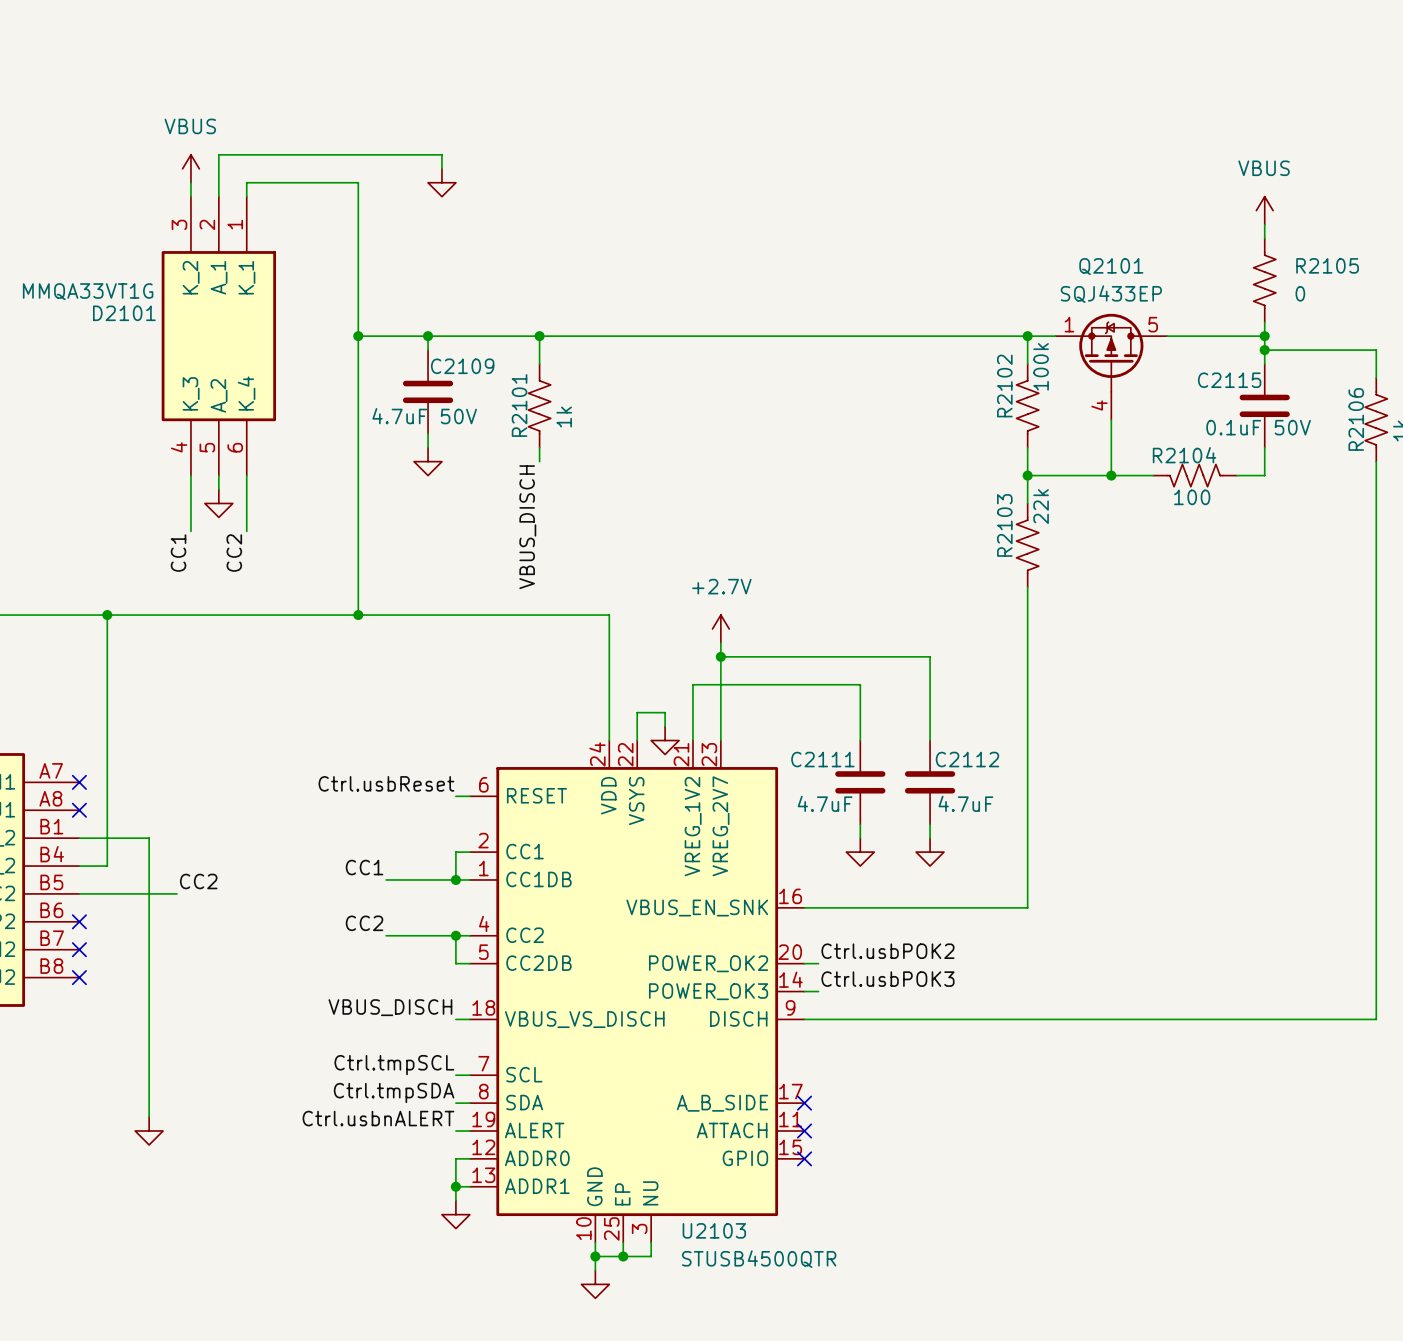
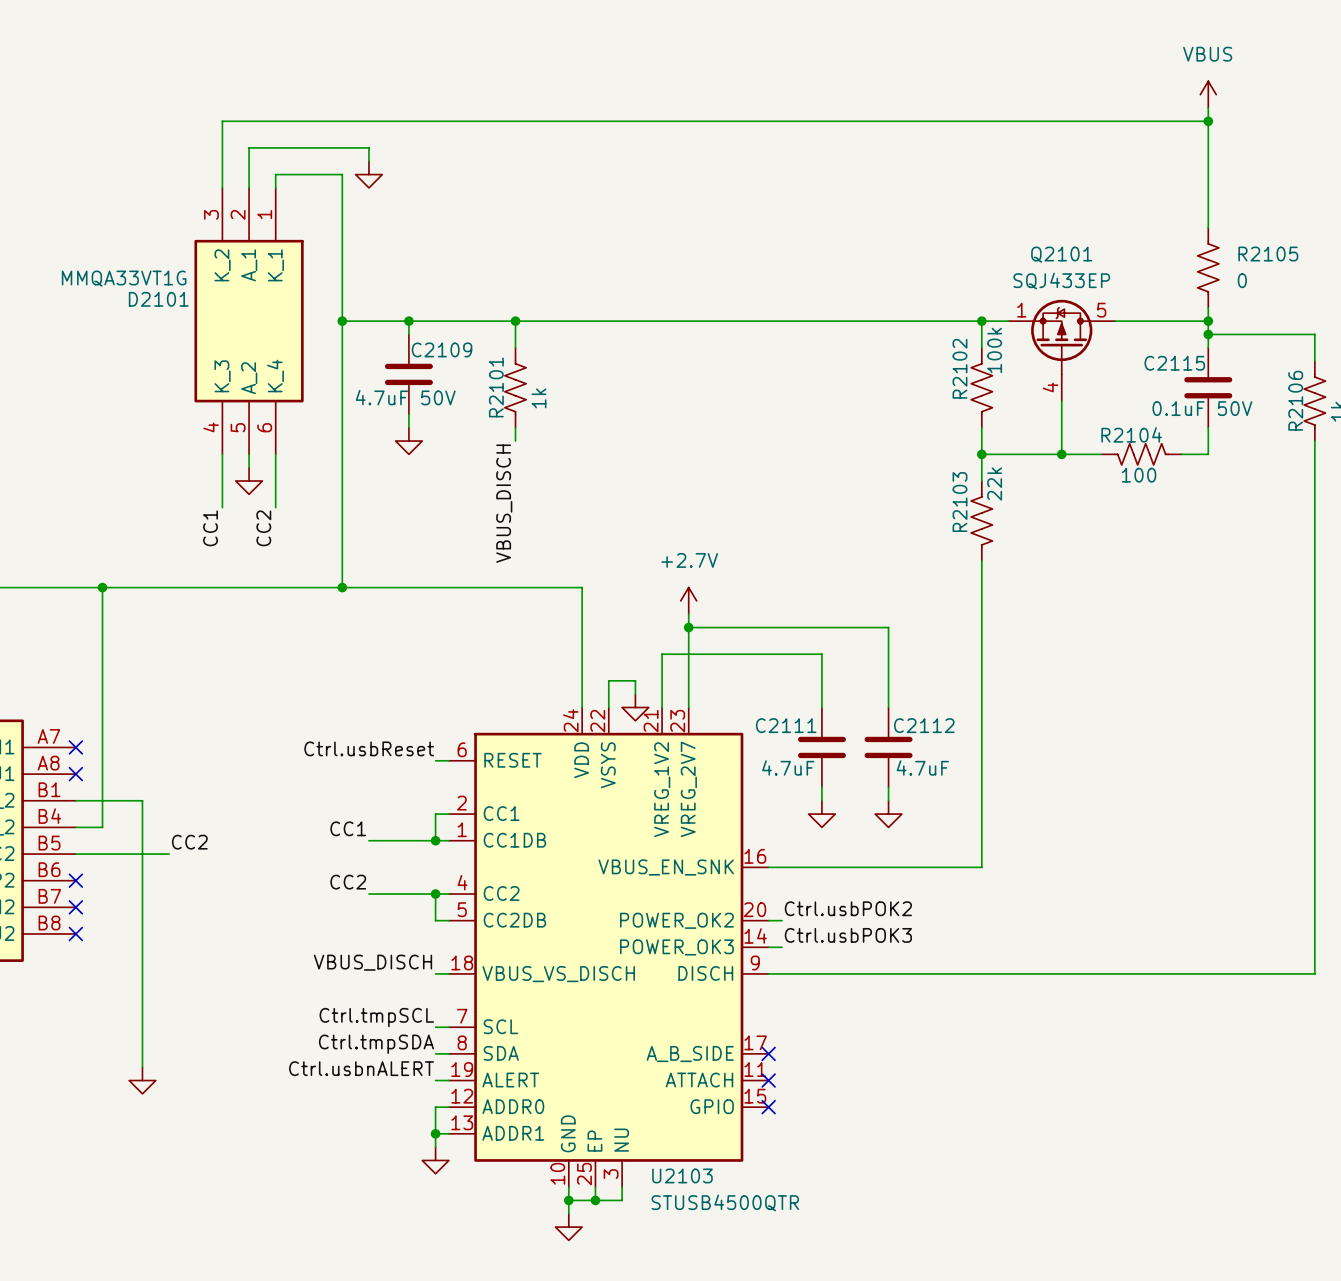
wire: none -> (1208, 107) (1208, 214)
wire: none -> (1208, 121) (222, 121) (222, 187)
junction: none -> (1208, 121)
wire: (260, 154) (218, 154) (218, 196) -> (249, 147) (249, 187)
wire: (386, 154) (441, 154) (441, 168) -> (368, 147) (368, 161)
power symbol: VBUS (190, 168) -> none
wire: (190, 182) (190, 196) -> none
wire: (288, 182) (246, 182) (246, 196) -> (275, 174) (275, 187)
power symbol position: (441, 182) -> (368, 174)
power symbol position: VBUS (1264, 210) -> VBUS (1208, 94)
D2101 position: (218, 336) -> (249, 321)
wire: (190, 475) (190, 531) -> (222, 454) (222, 507)
wire: (218, 475) (218, 489) -> (249, 454) (249, 467)
wire: (246, 475) (246, 531) -> (275, 454) (275, 507)
power symbol position: (218, 503) -> (249, 481)
label position: CC1 (178, 553) -> CC1 (210, 528)
label position: CC2 (234, 553) -> CC2 (263, 528)

